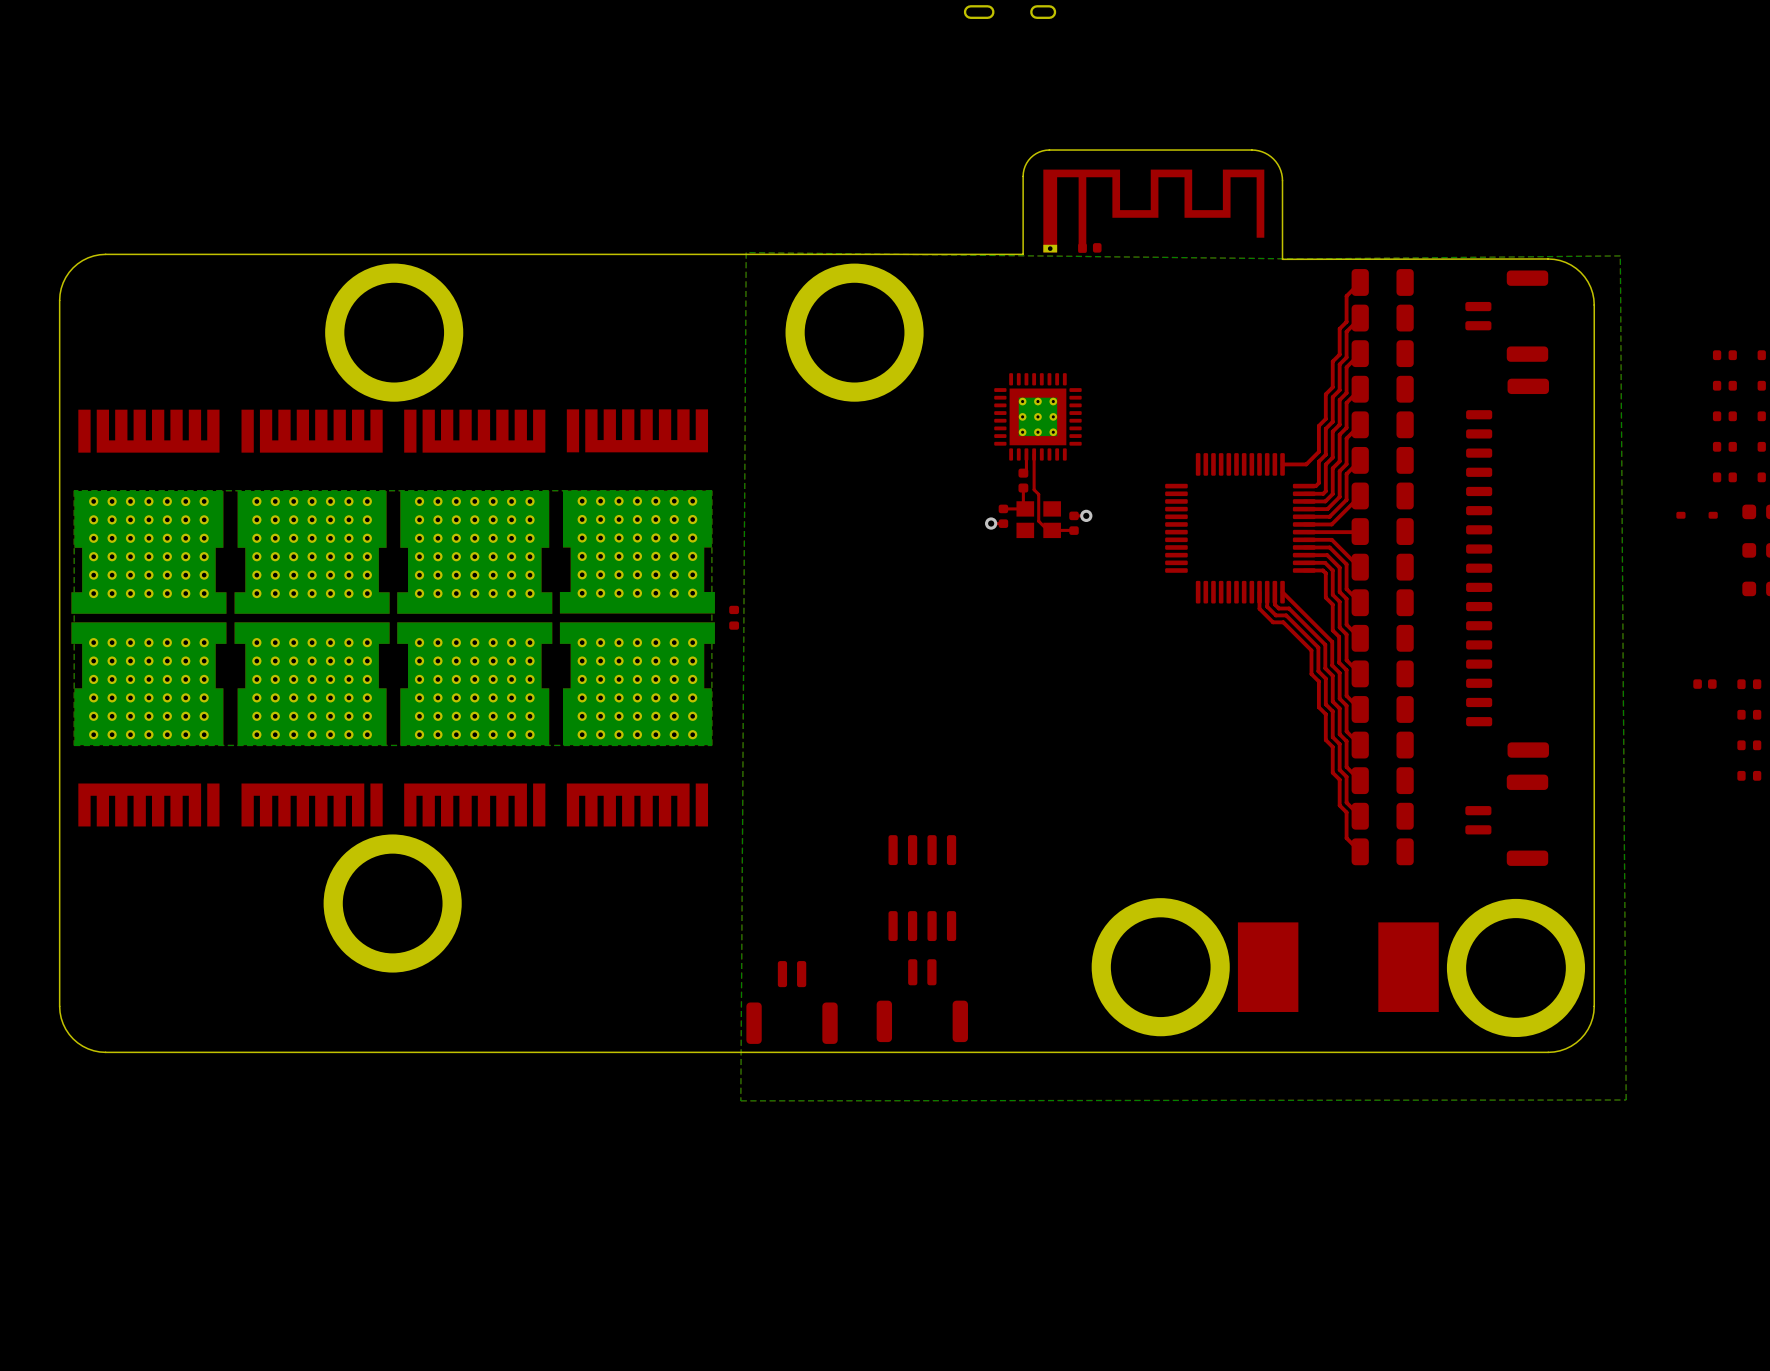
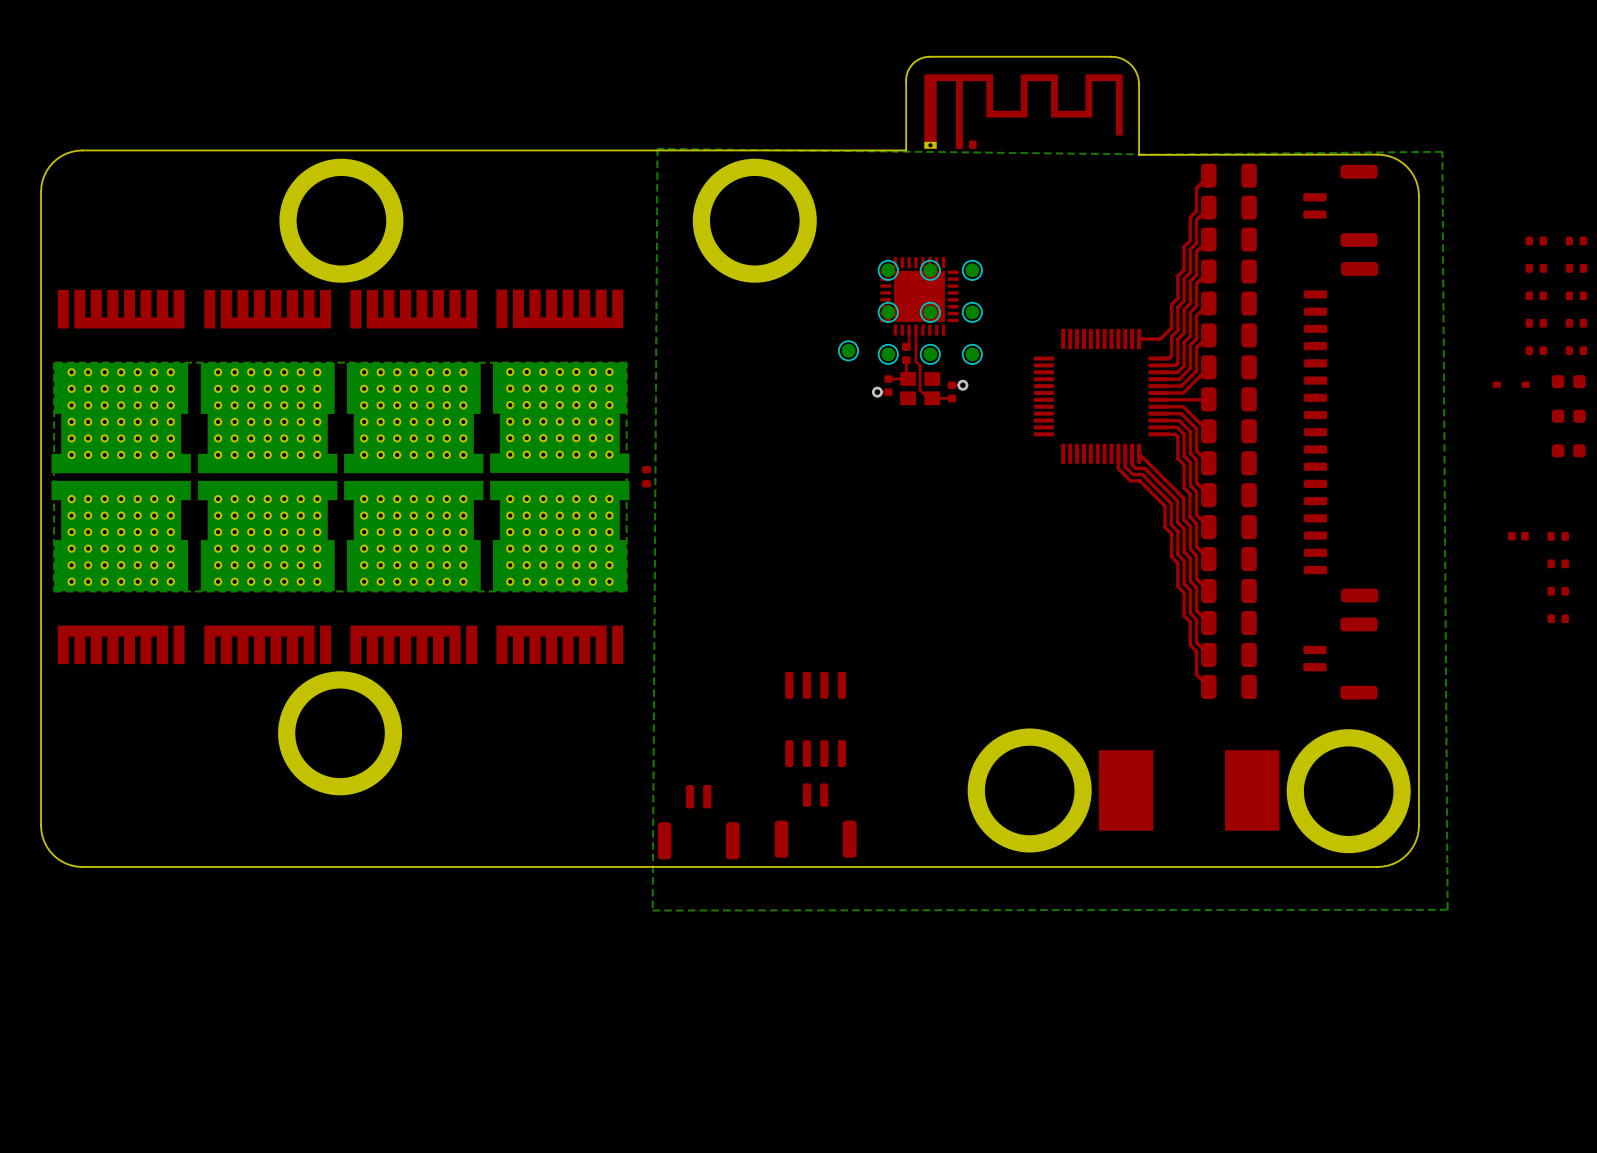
part footprint: [994, 373, 1082, 461] -> [880, 257, 959, 336]
part: none -> (888, 270)
part: none -> (930, 270)
part: none -> (972, 270)
part: none -> (888, 312)
part: none -> (930, 312)
part: none -> (972, 312)
part: none -> (848, 350)
part: none -> (888, 354)
part: none -> (930, 354)
part: none -> (972, 354)

